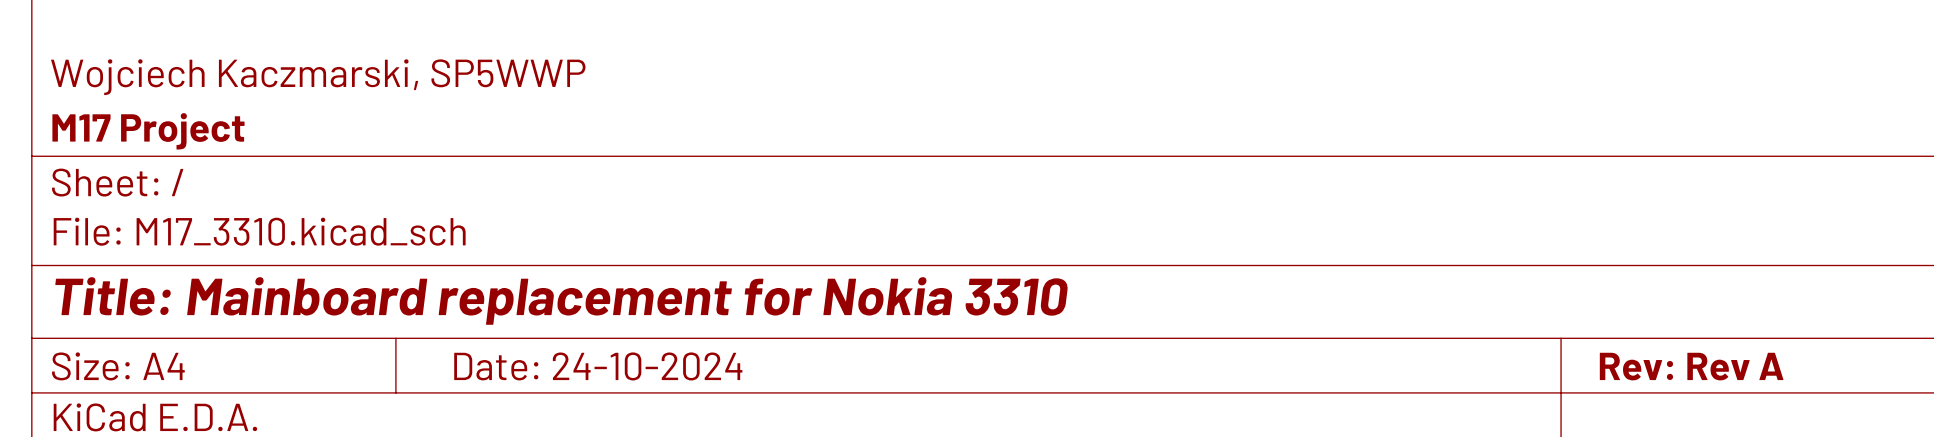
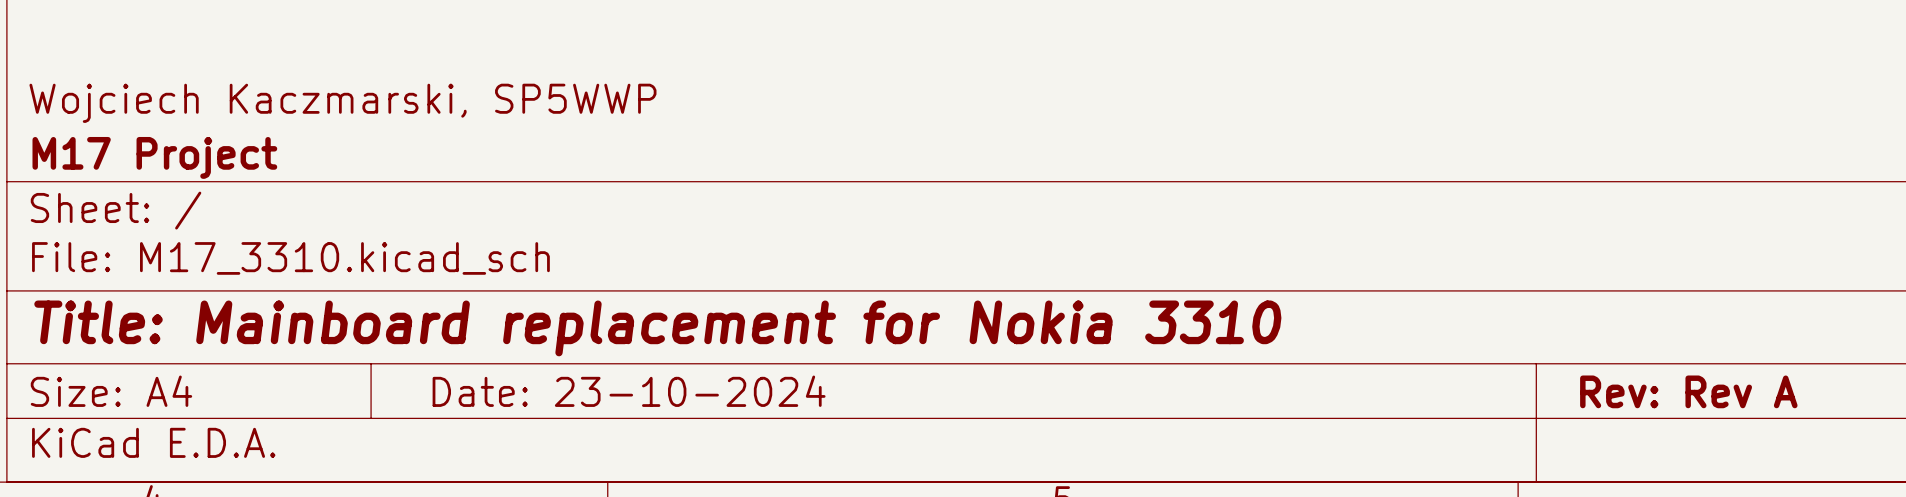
title block: Date: 24-10-2024 (598, 366) -> Date: 23-10-2024 (629, 391)

